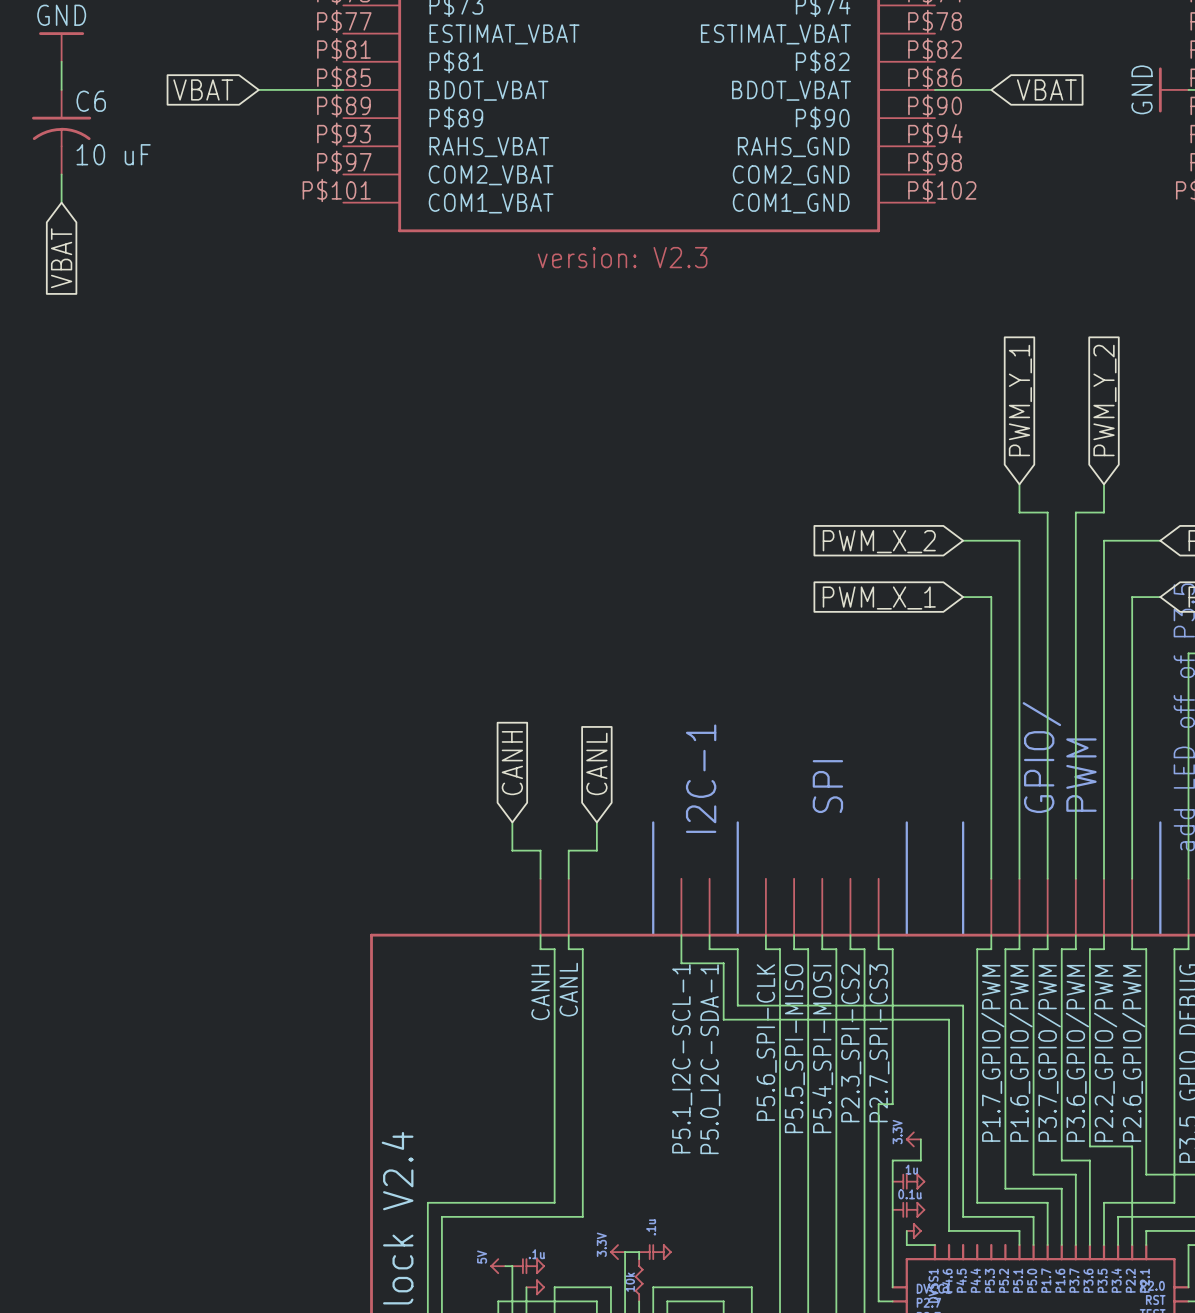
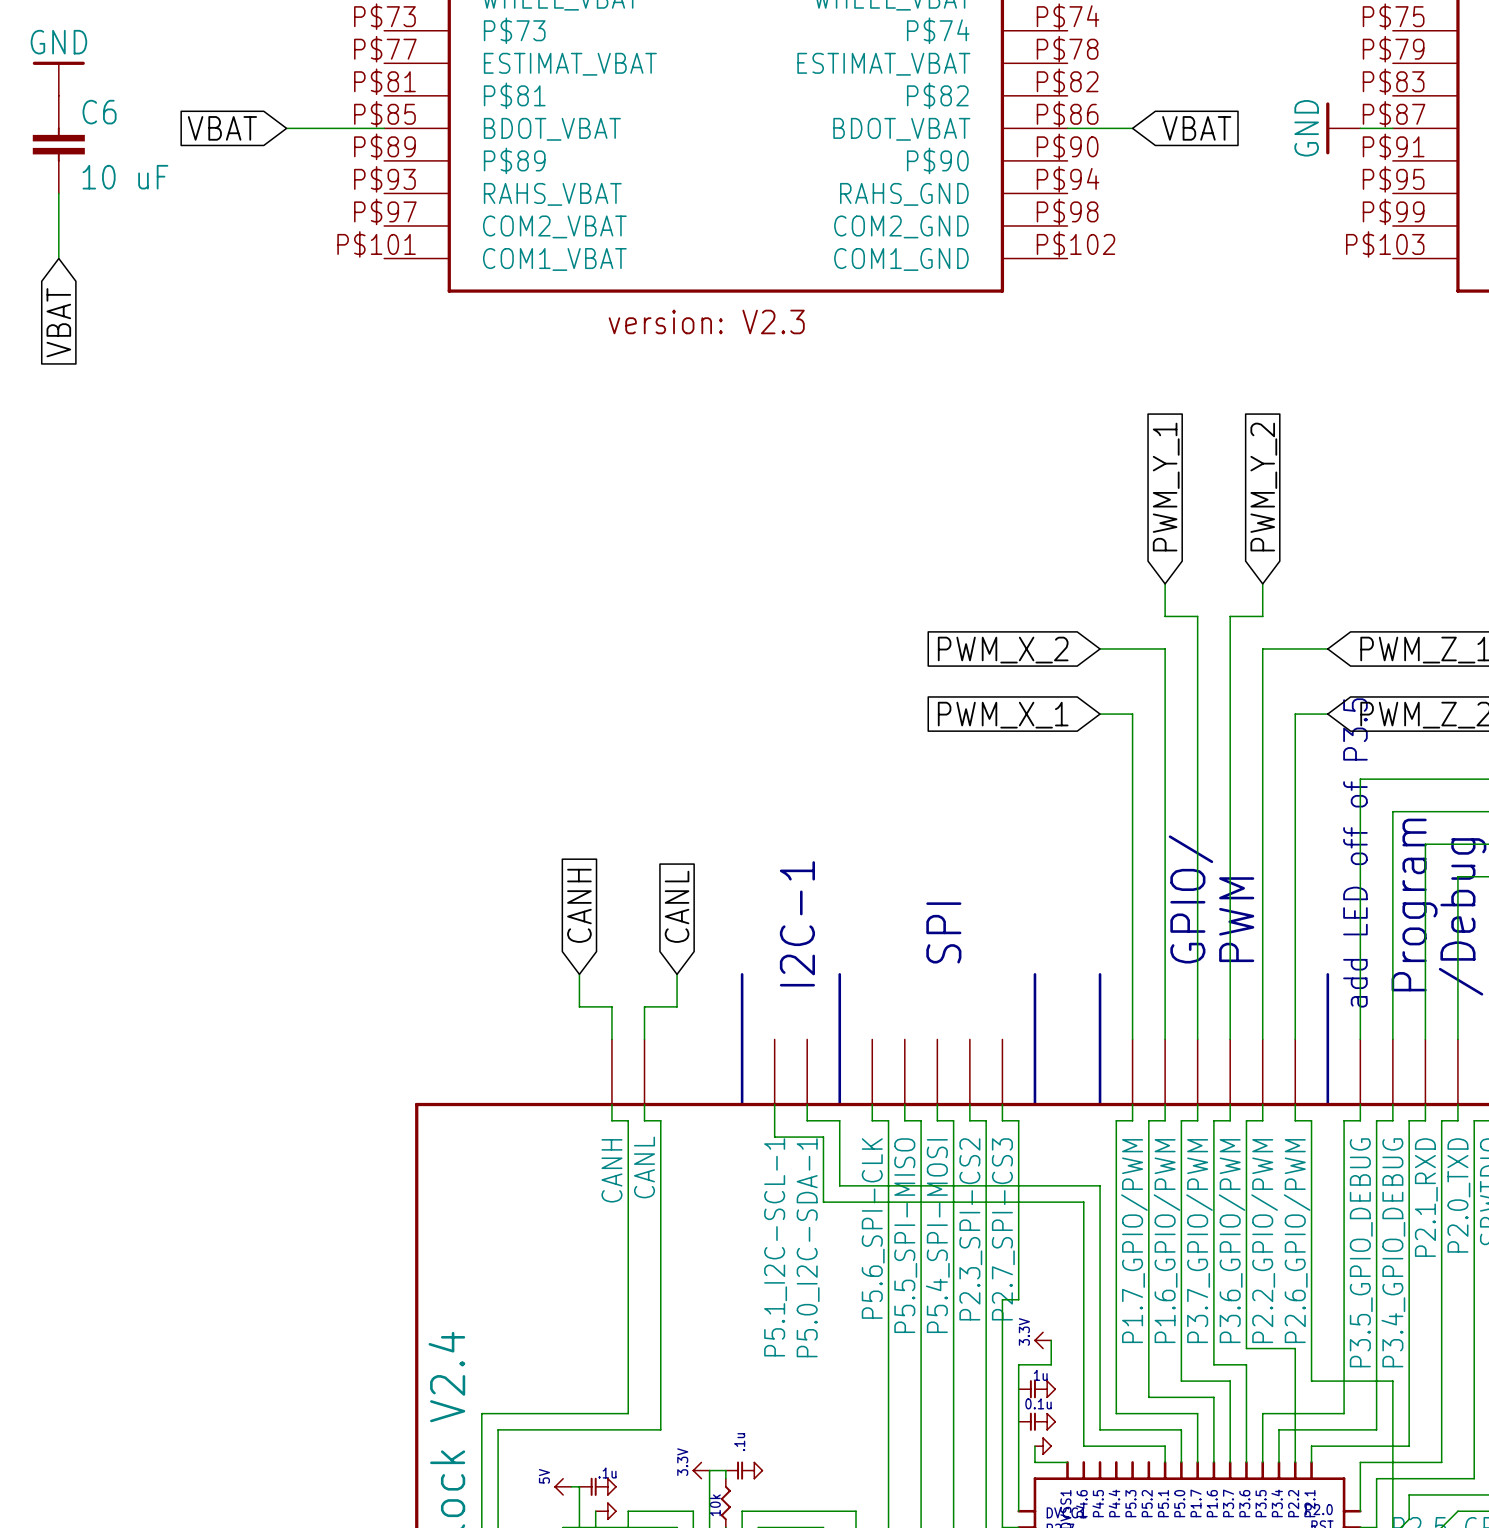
C6 symbol: [32, 89, 92, 175] -> [32, 95, 85, 194]

